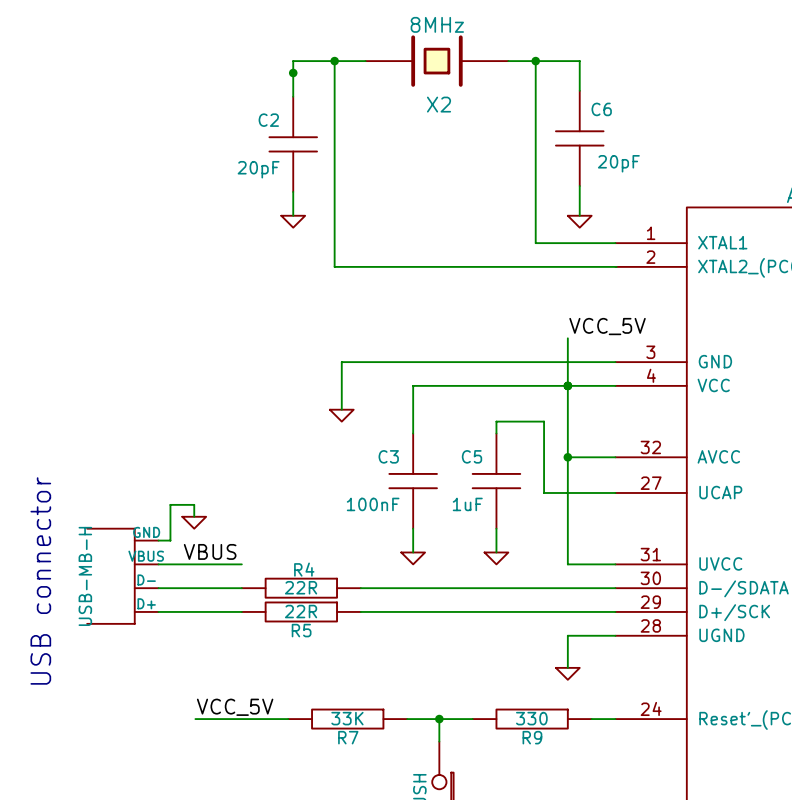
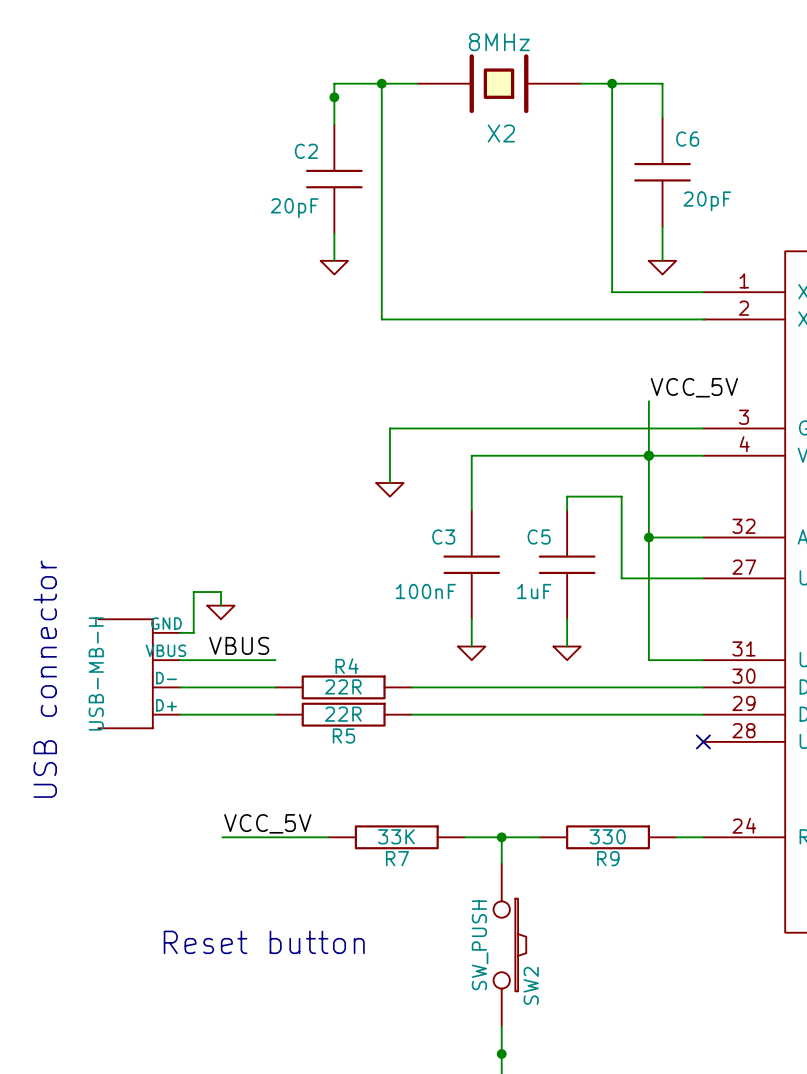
wire: (615, 635) (567, 635) (567, 667) -> none
no-connect mark: none -> (703, 741)
power symbol: (567, 673) -> none

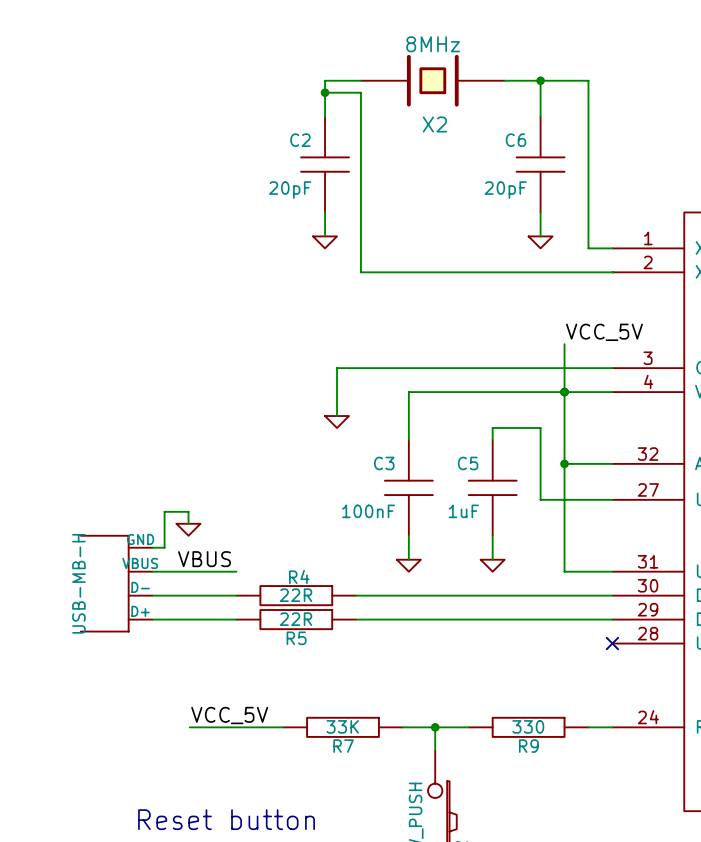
wire: (381, 83) (381, 319) (417, 319) -> (325, 92) (360, 92) (360, 272)
junction: (381, 83) -> none
wire: (417, 83) (334, 83) (334, 124) -> none
X2 position: (498, 83) -> (432, 80)
wire: (580, 83) (662, 83) (662, 117) -> none
wire: (612, 83) (612, 292) (676, 292) -> (504, 80) (588, 80) (588, 248)
junction position: (612, 83) -> (540, 80)
junction: (334, 97) -> none
wire: none -> (360, 80) (325, 80) (325, 116)
wire: none -> (540, 80) (540, 116)
junction: none -> (325, 92)
C6 name position: C6 (687, 139) -> C6 (515, 140)
C6 position: (662, 172) -> (540, 164)
C2 position: (334, 179) -> (325, 164)
C6 value position: 20pF (707, 201) -> 20pF (505, 190)
wire: (662, 226) (662, 260) -> none
wire: (334, 233) (334, 260) -> (325, 212) (325, 236)
wire: none -> (540, 212) (540, 236)
power symbol position: (334, 267) -> (325, 242)
power symbol position: (662, 267) -> (540, 242)
text: USB connector (45, 679) -> none

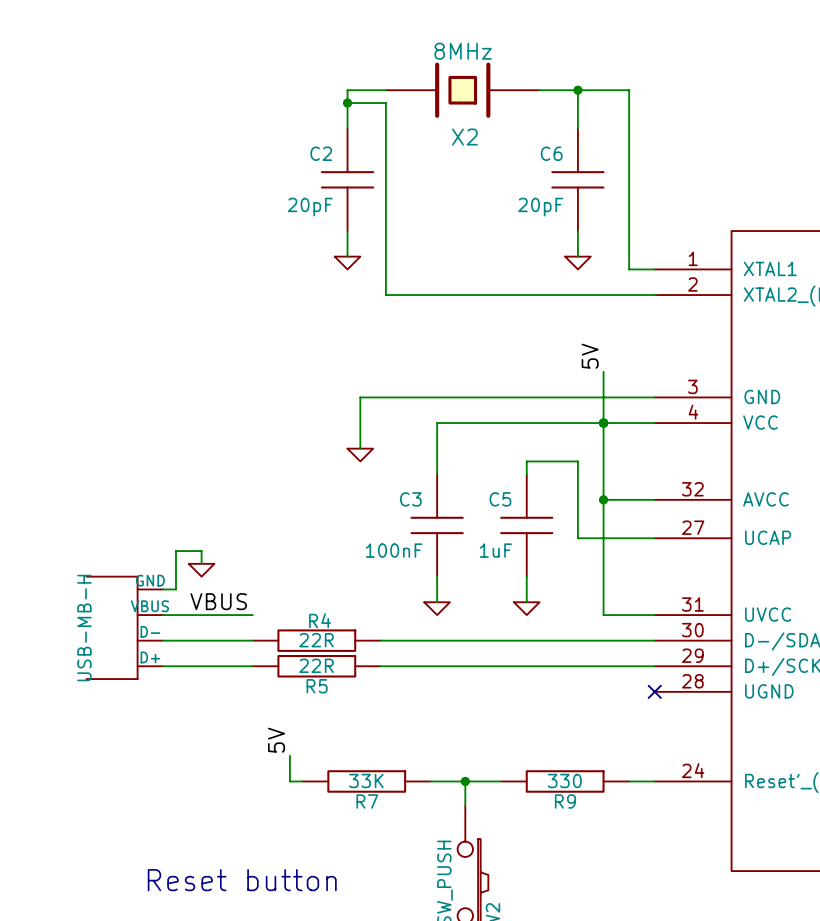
label: VCC_5V (604, 332) -> 5V (590, 356)
label: none -> 5V (276, 740)
label: VCC_5V (229, 715) -> none
wire: (189, 727) (271, 727) -> (289, 755) (289, 781)

